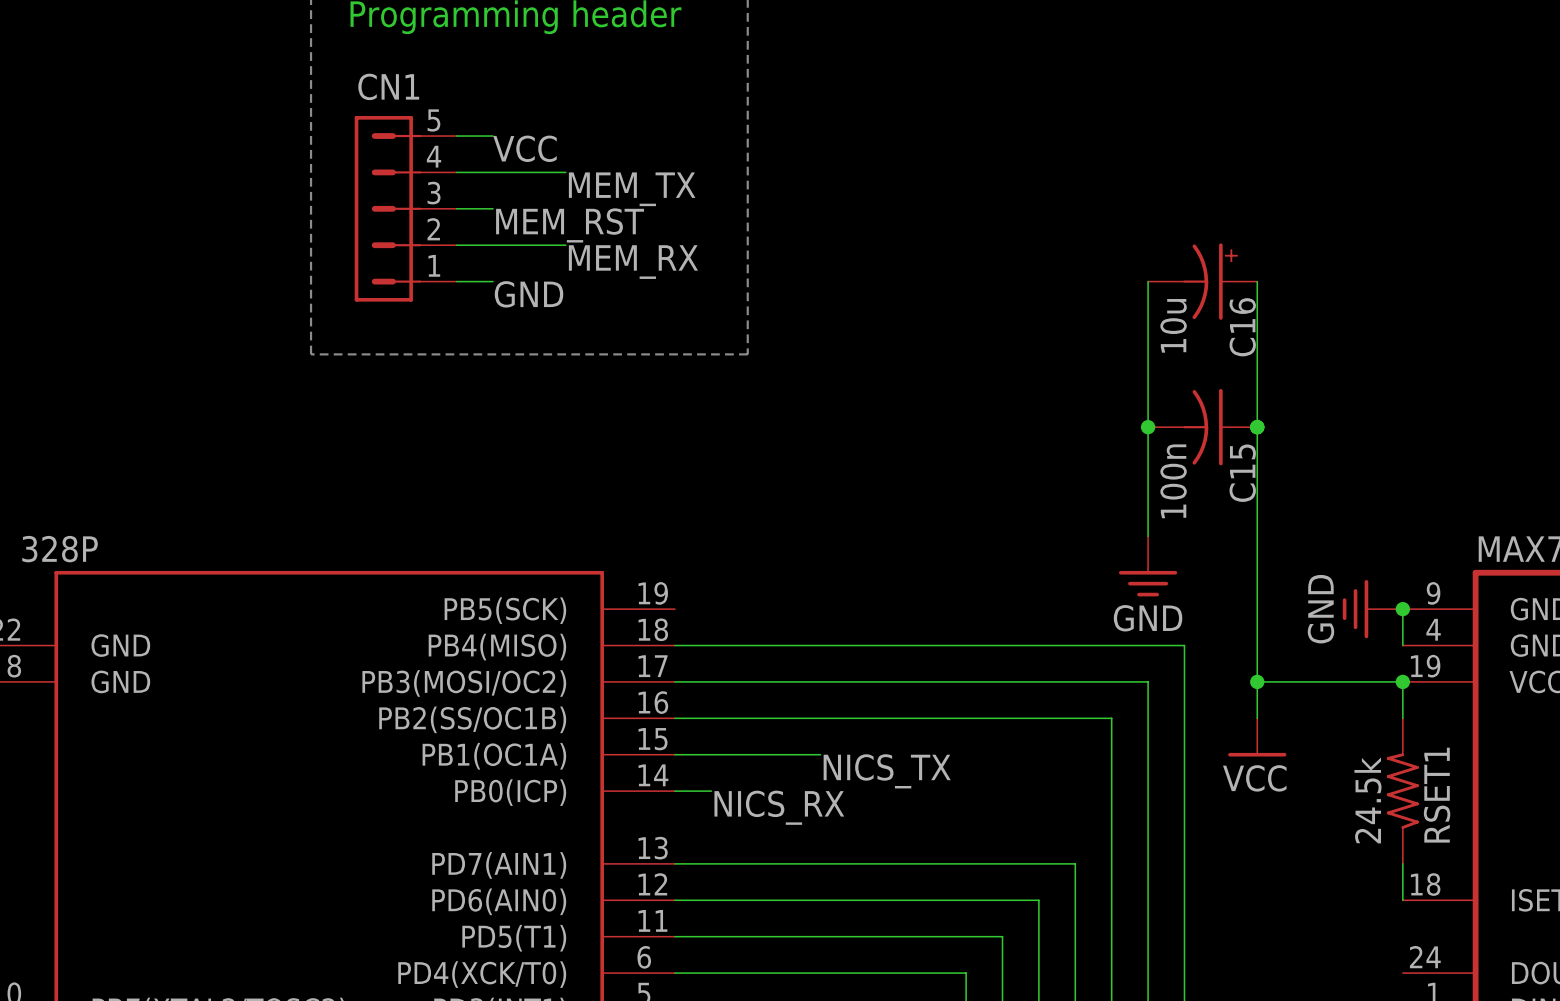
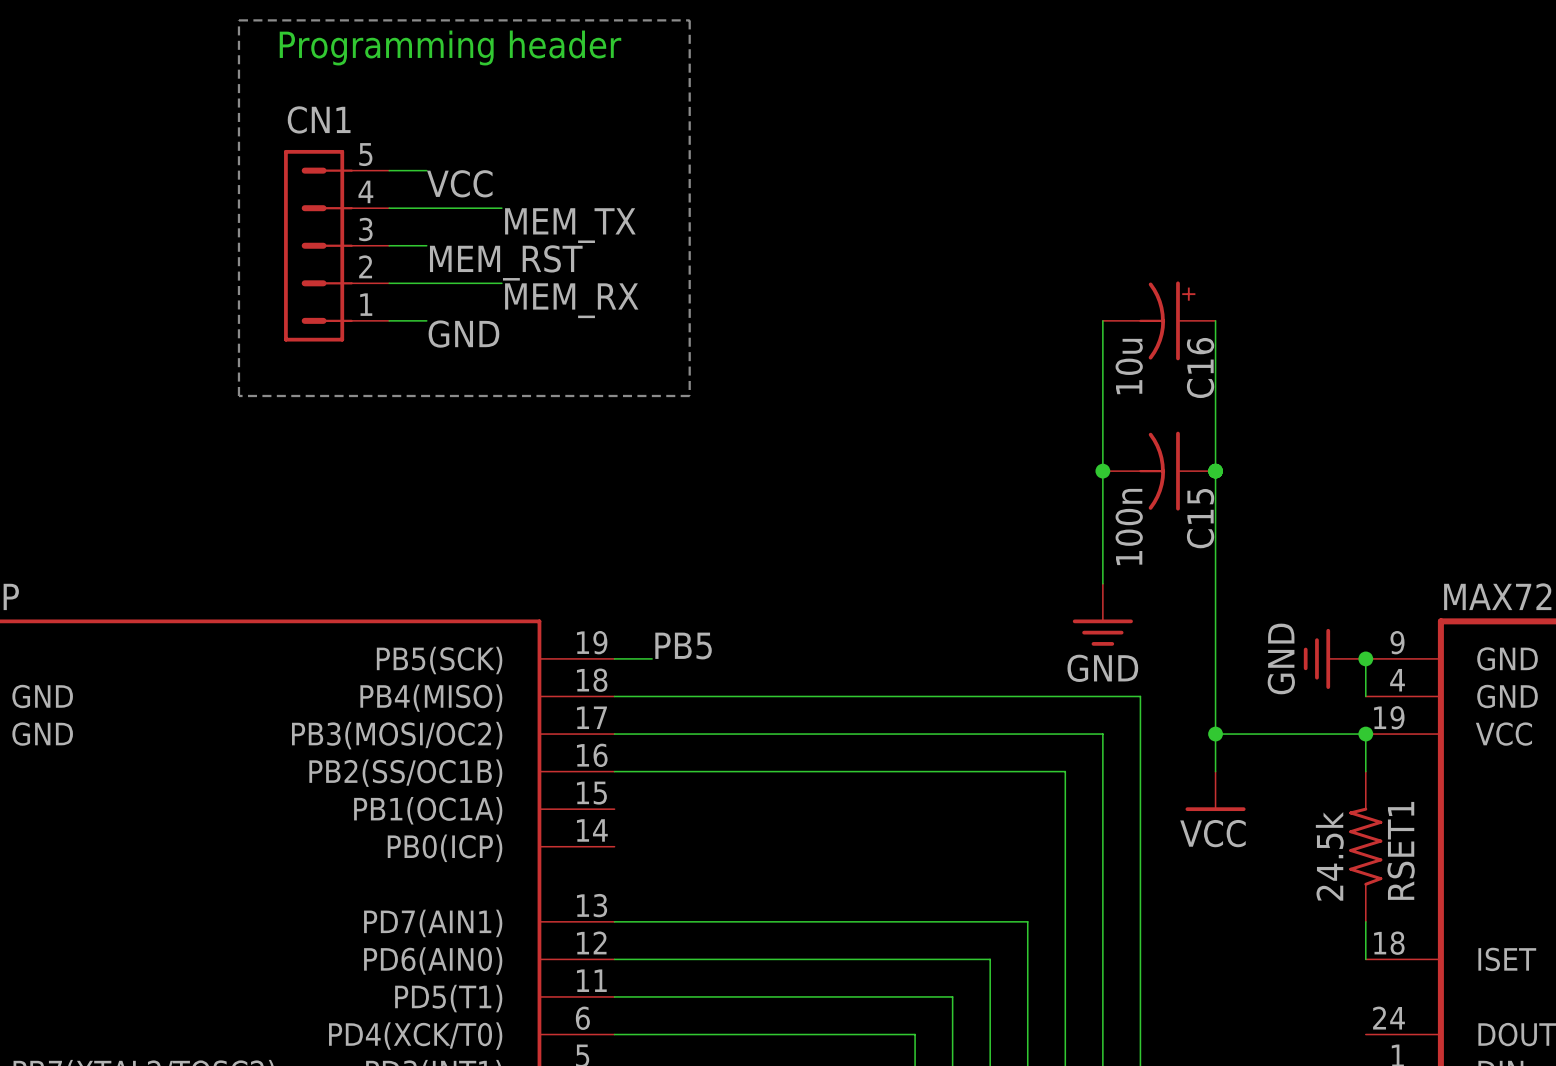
label: none -> PB5 (683, 646)
wire: (674, 754) (820, 754) -> none
label: NICS_TX (887, 771) -> none
wire: (674, 791) (711, 791) -> (614, 658) (652, 658)
label: NICS_RX (779, 807) -> none

